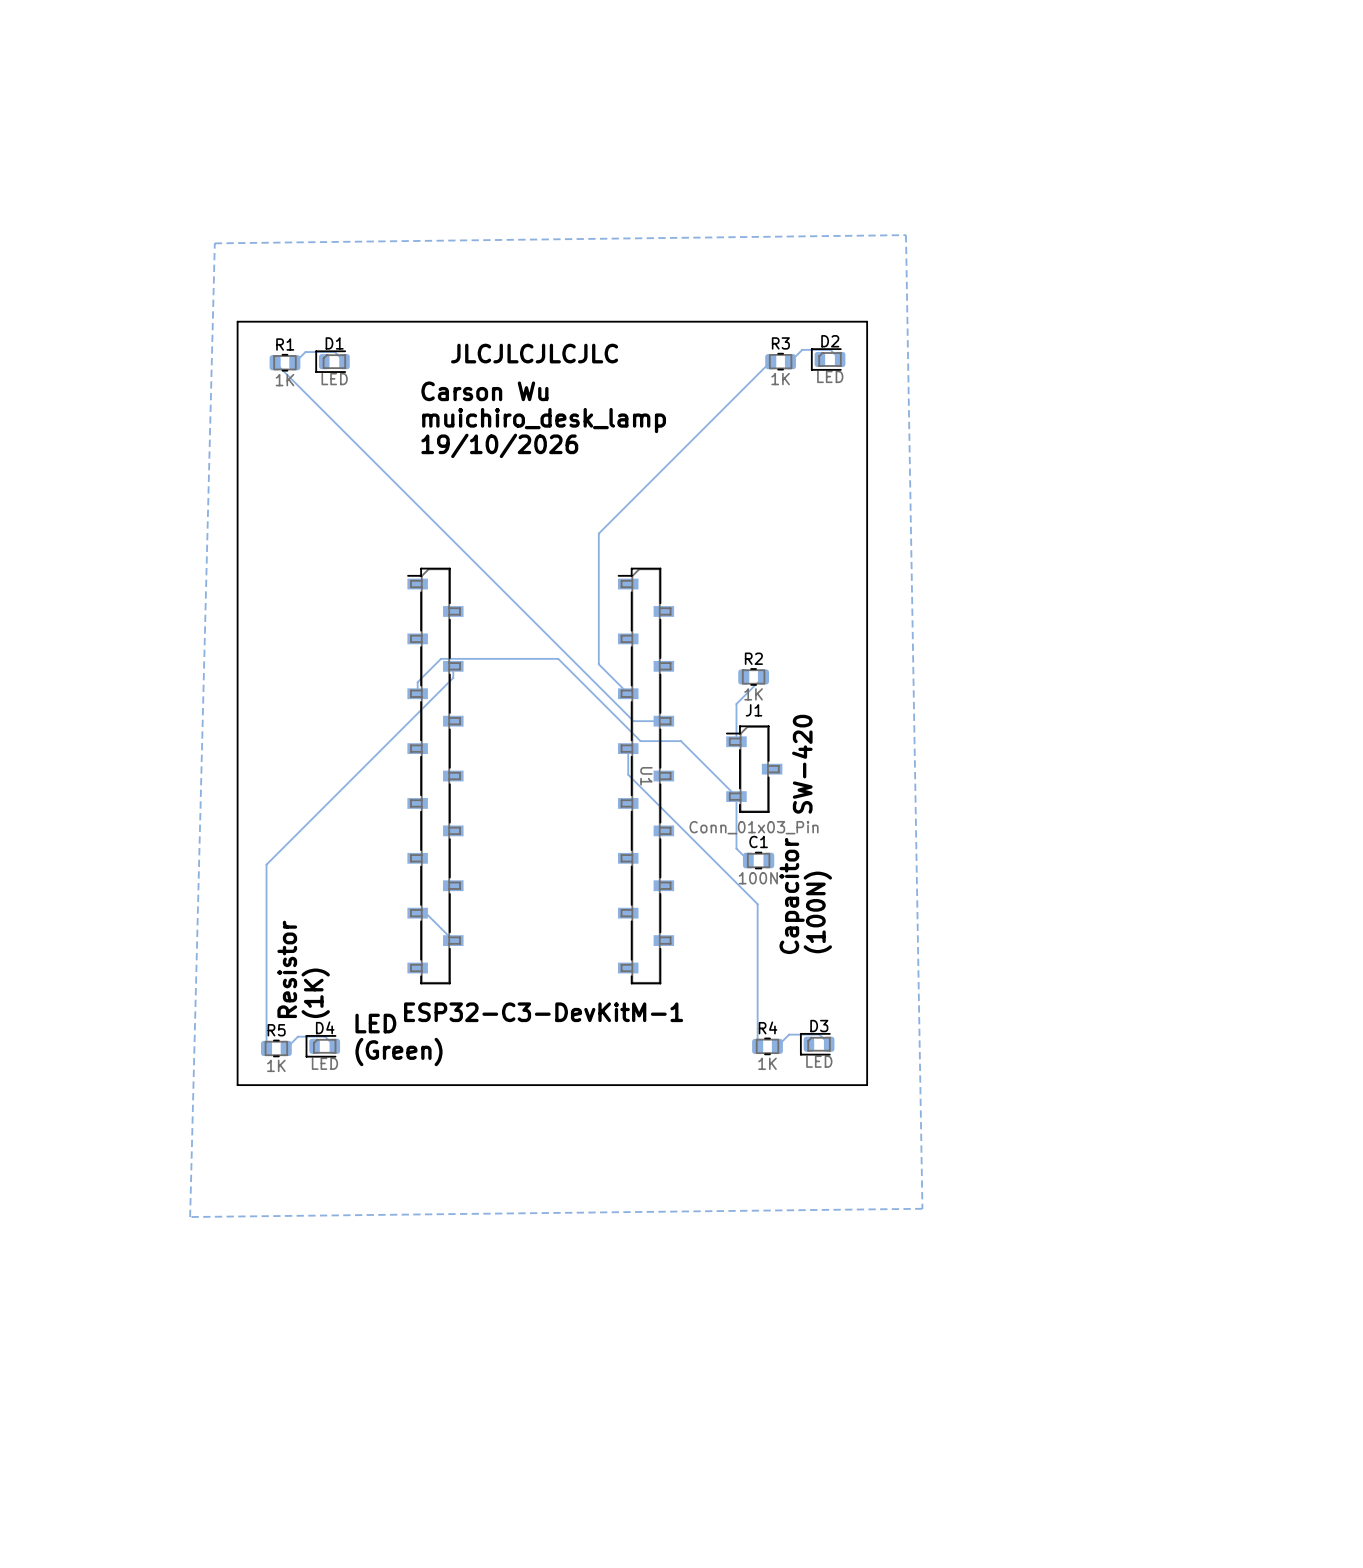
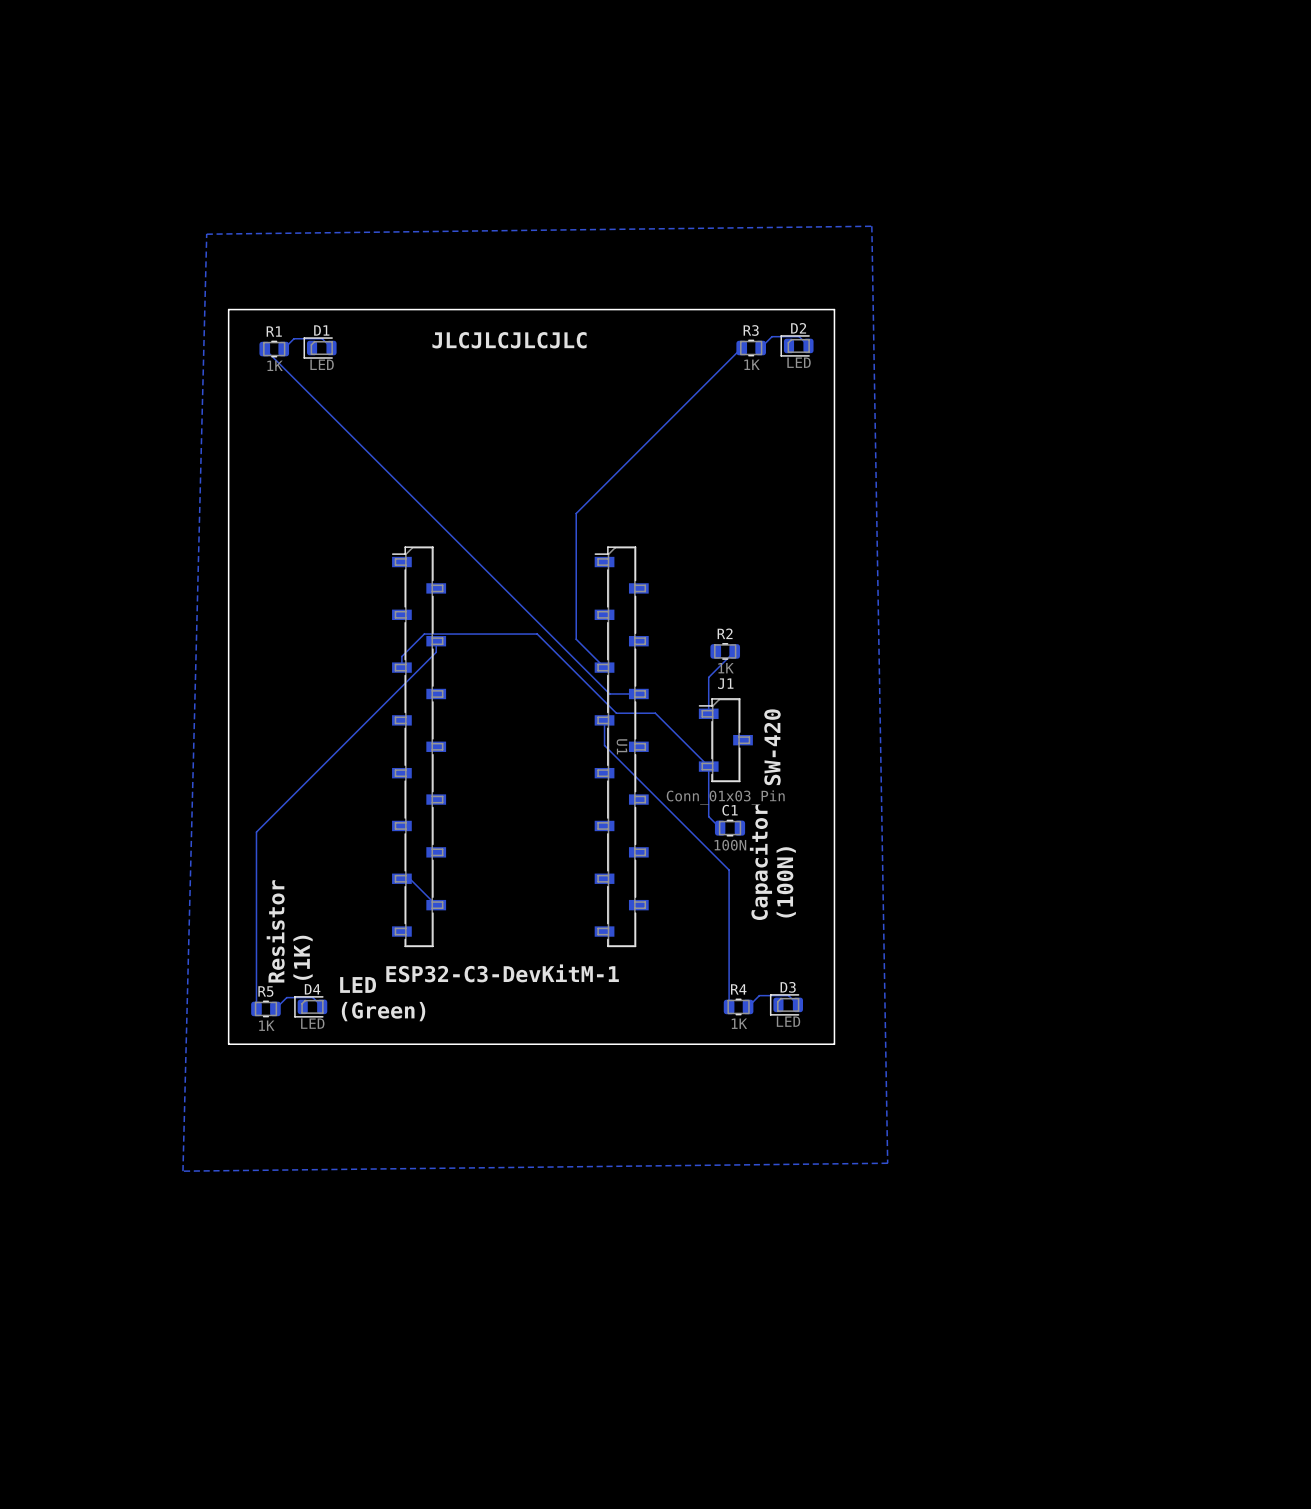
text: Carson Wu (484, 391) -> none
text: muichiro_desk_lamp (544, 420) -> none
text: 19/10/2026 (499, 445) -> none

